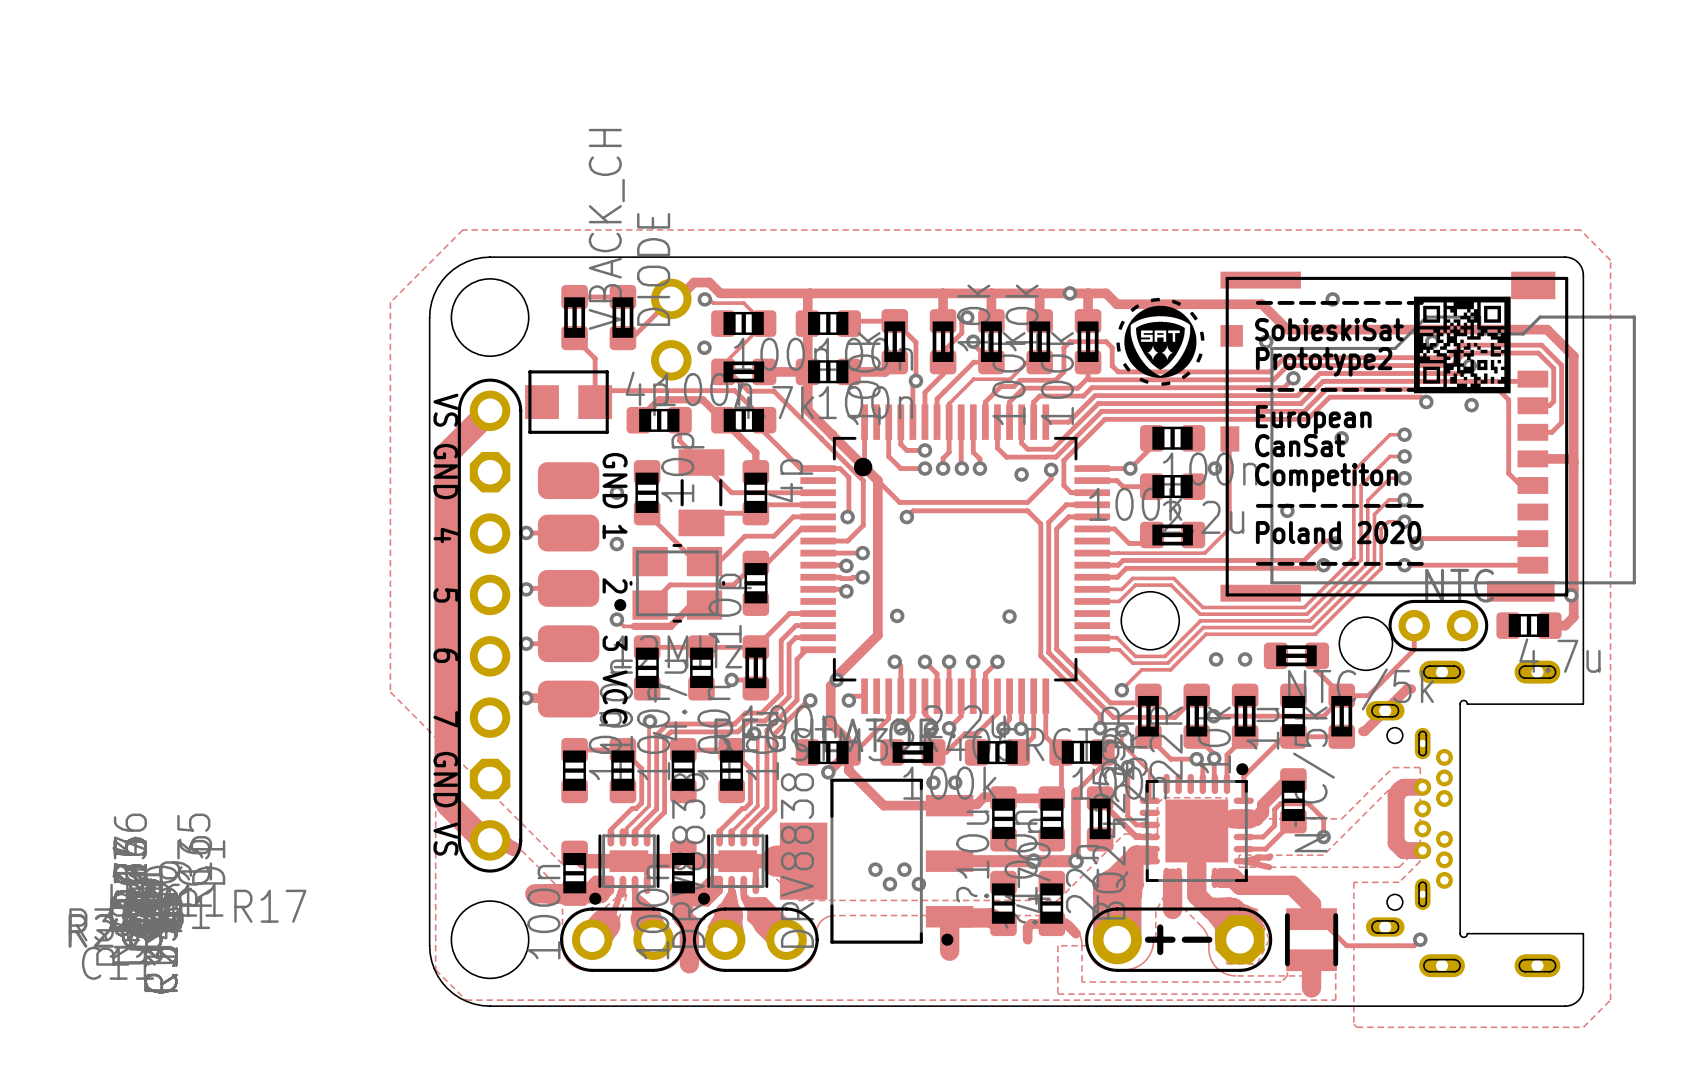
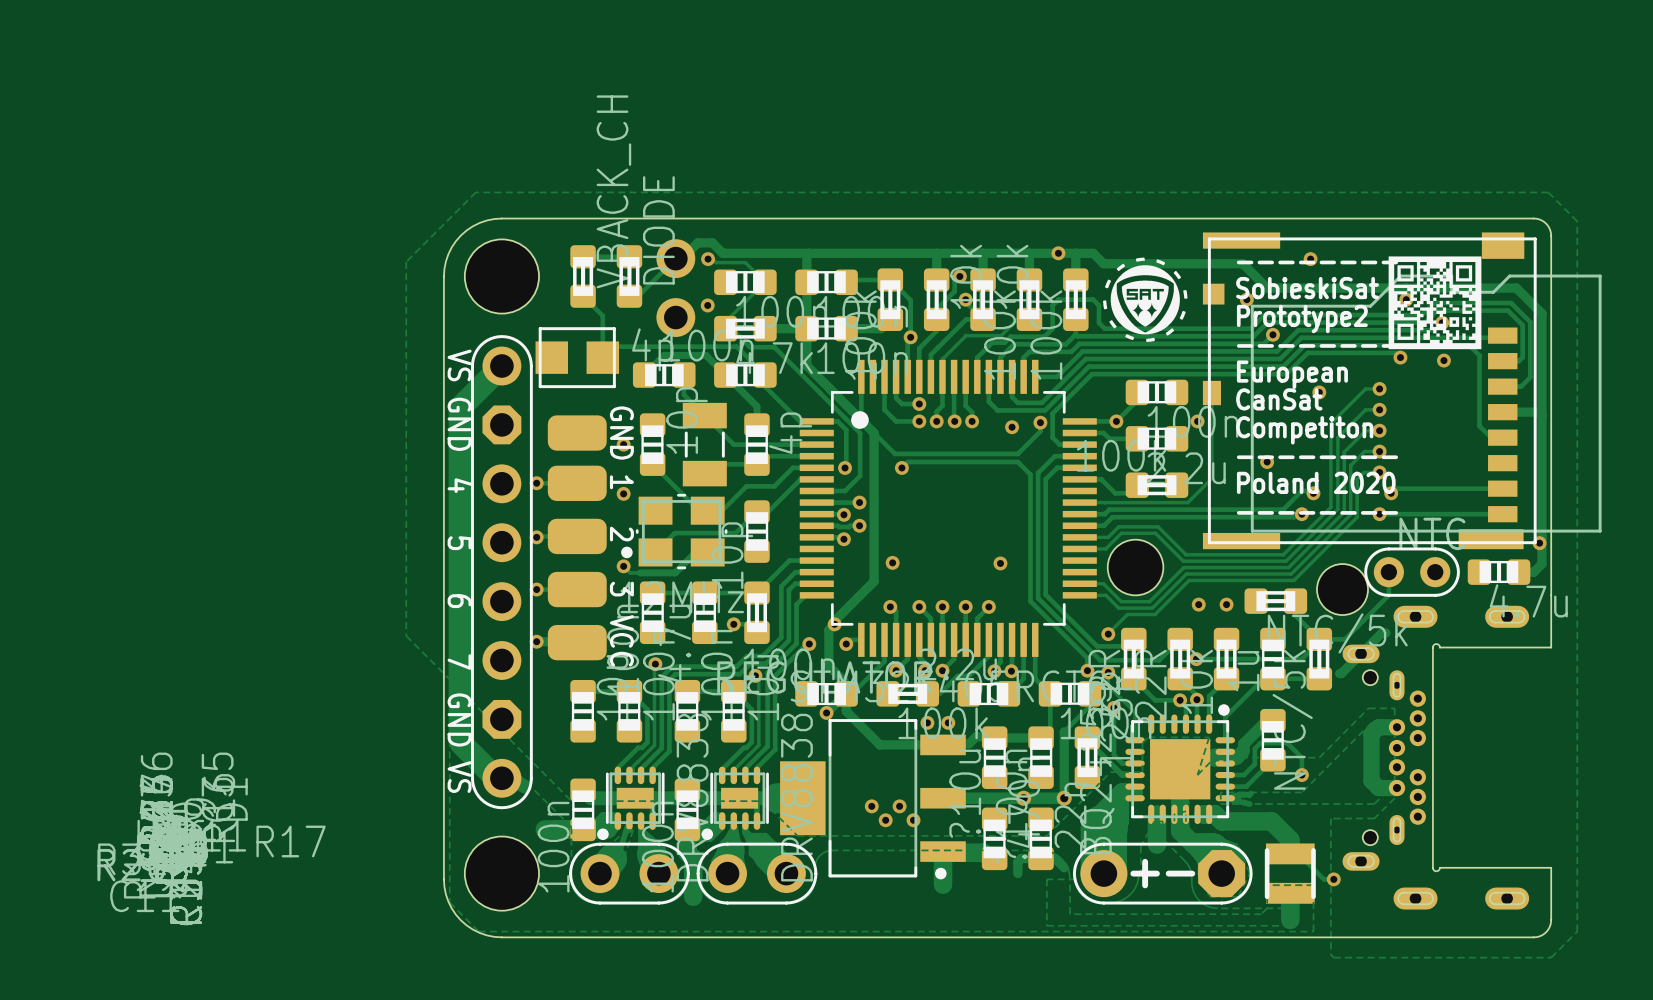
track: (1420, 939) (1414, 945) (1356, 945) -> none
via position: (1420, 939) -> (1333, 879)

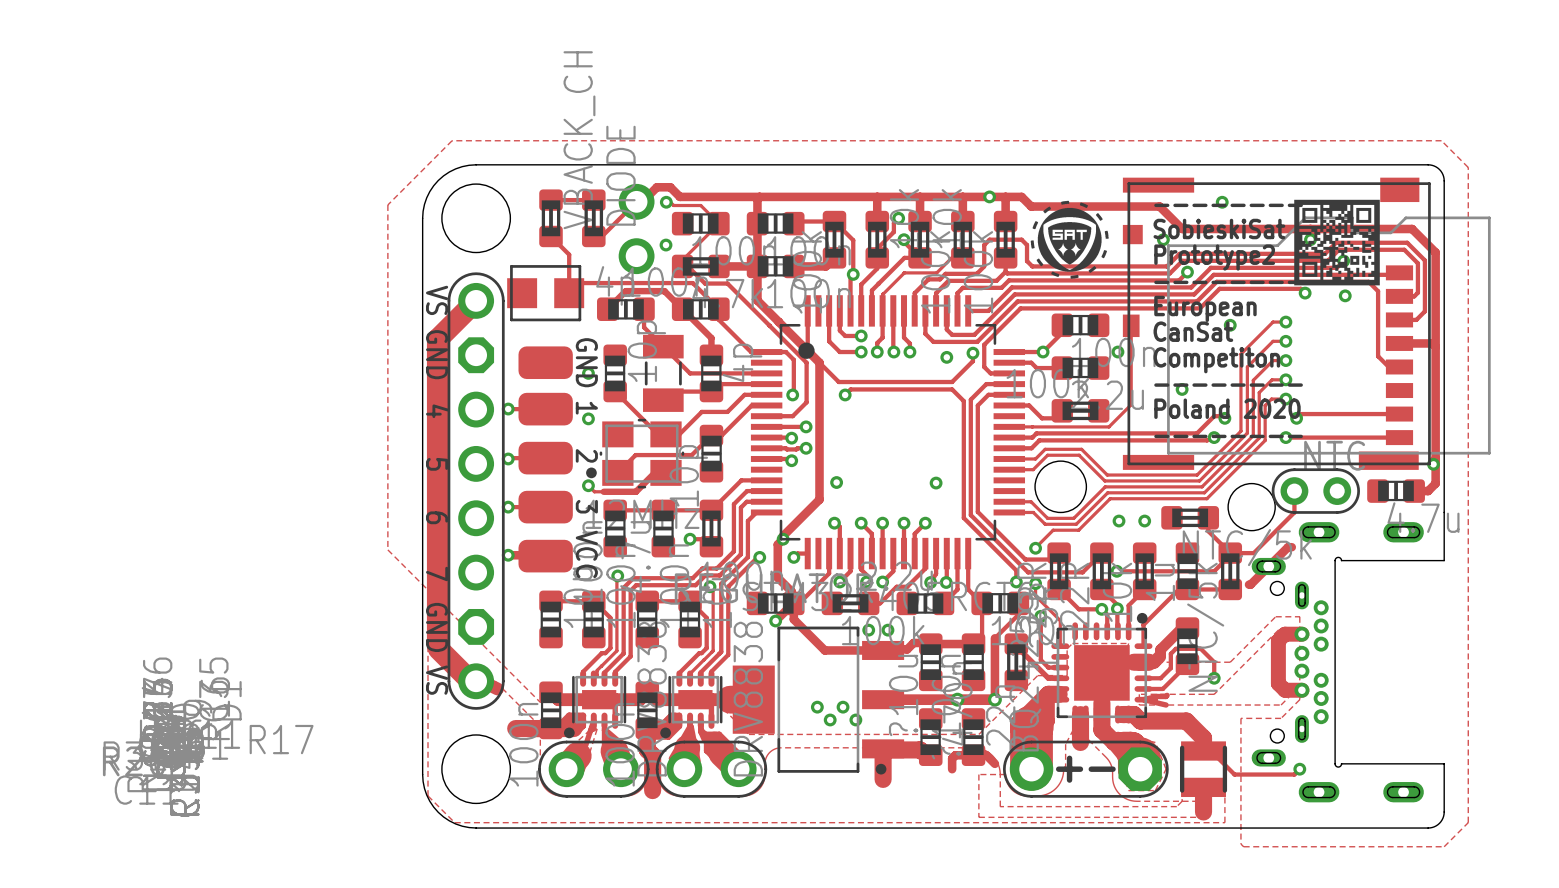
track: none -> (1299, 769) (1294, 774) (1243, 774)
via position: (1333, 879) -> (1299, 769)

